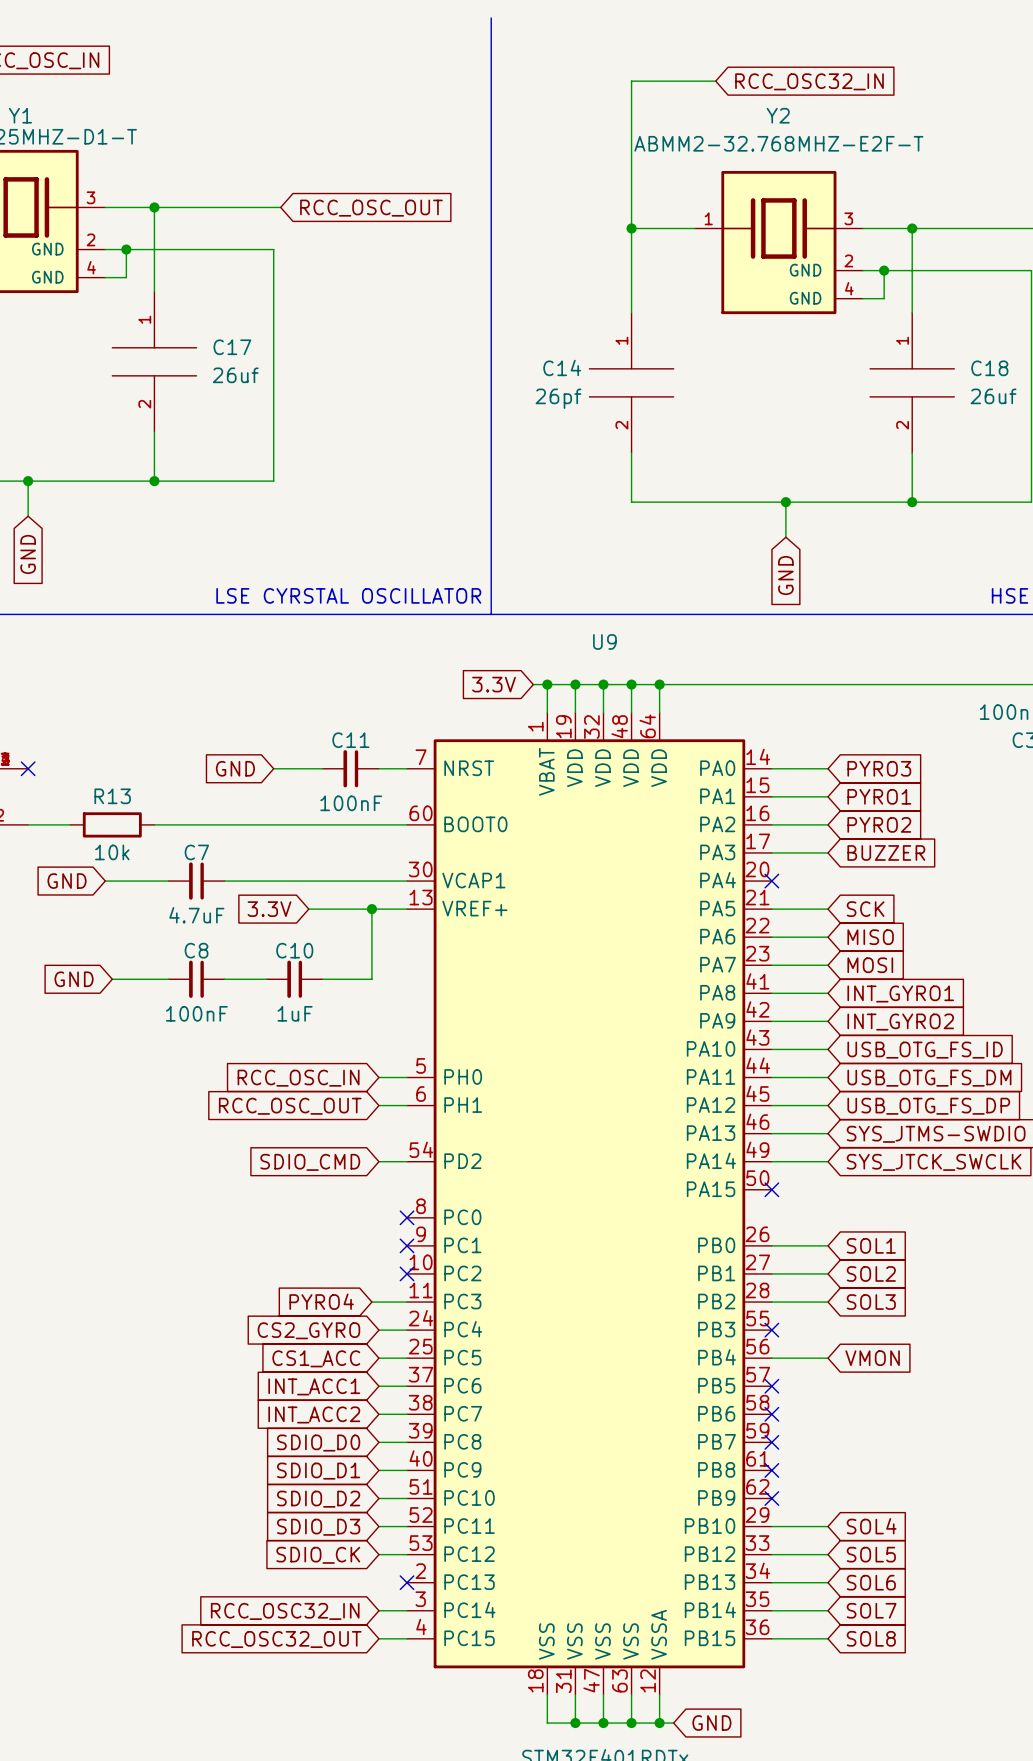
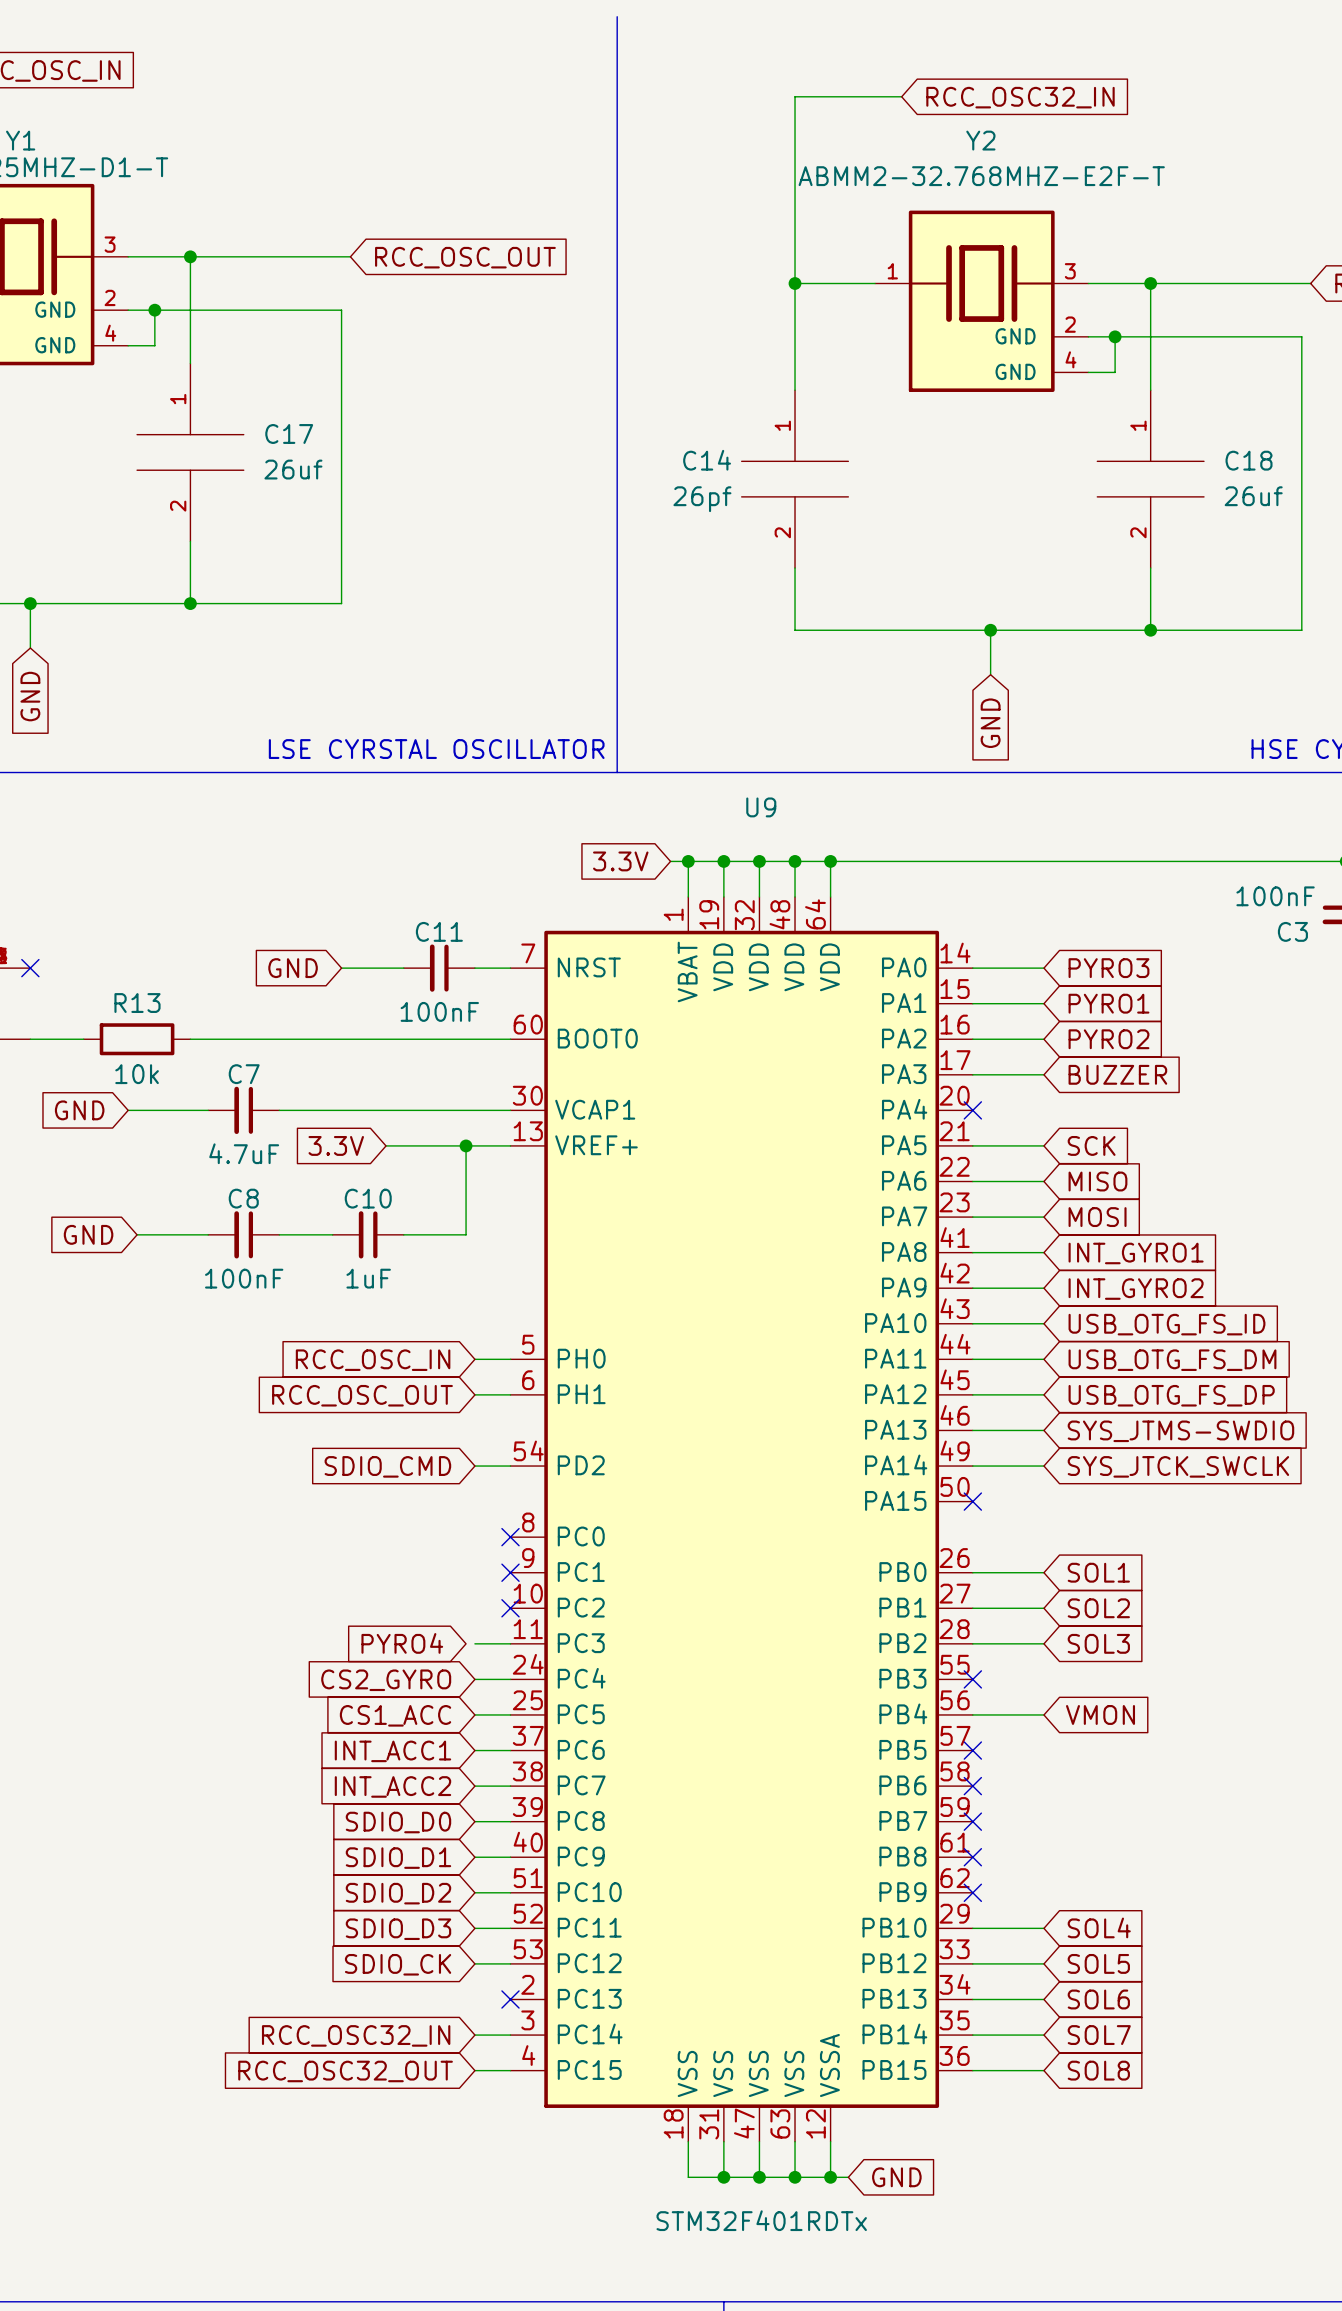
wire: (371, 1302) (378, 1302) -> none

